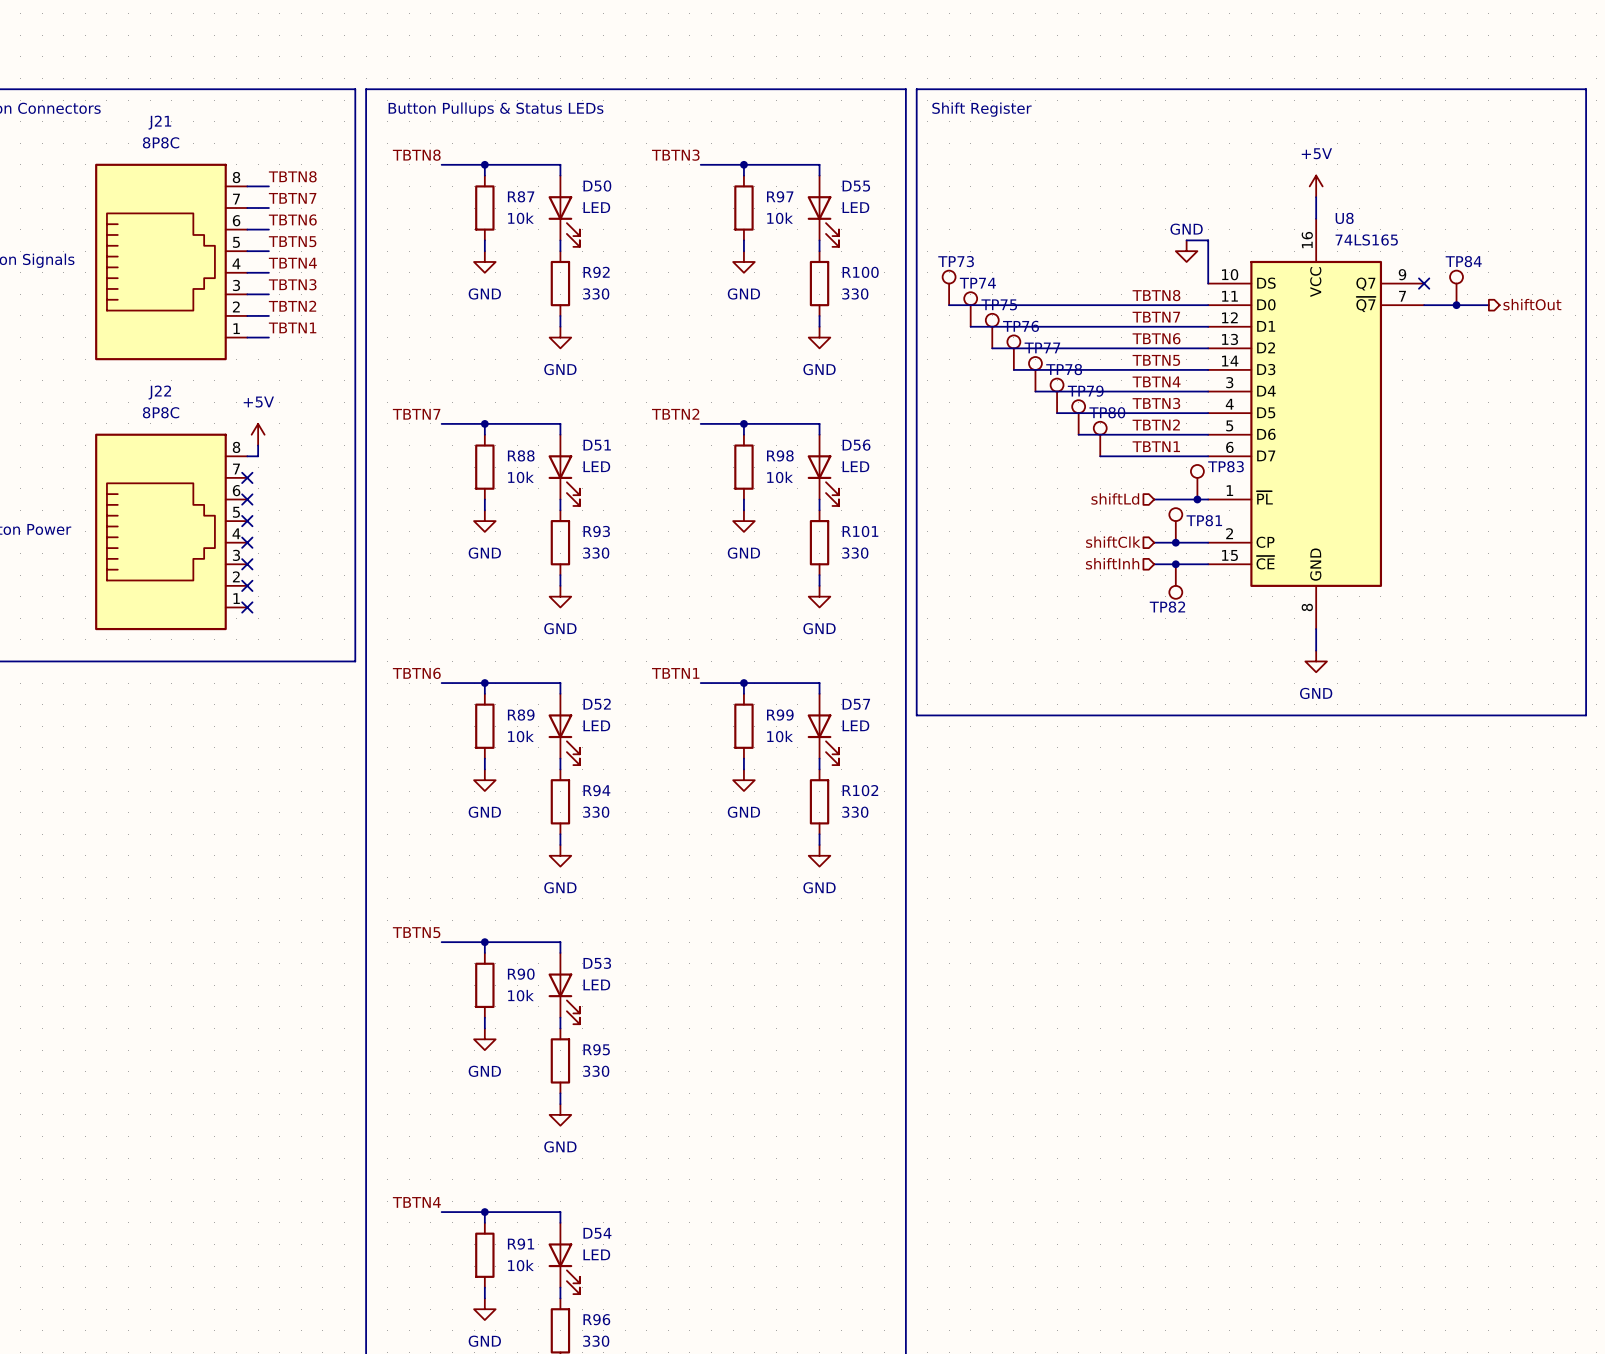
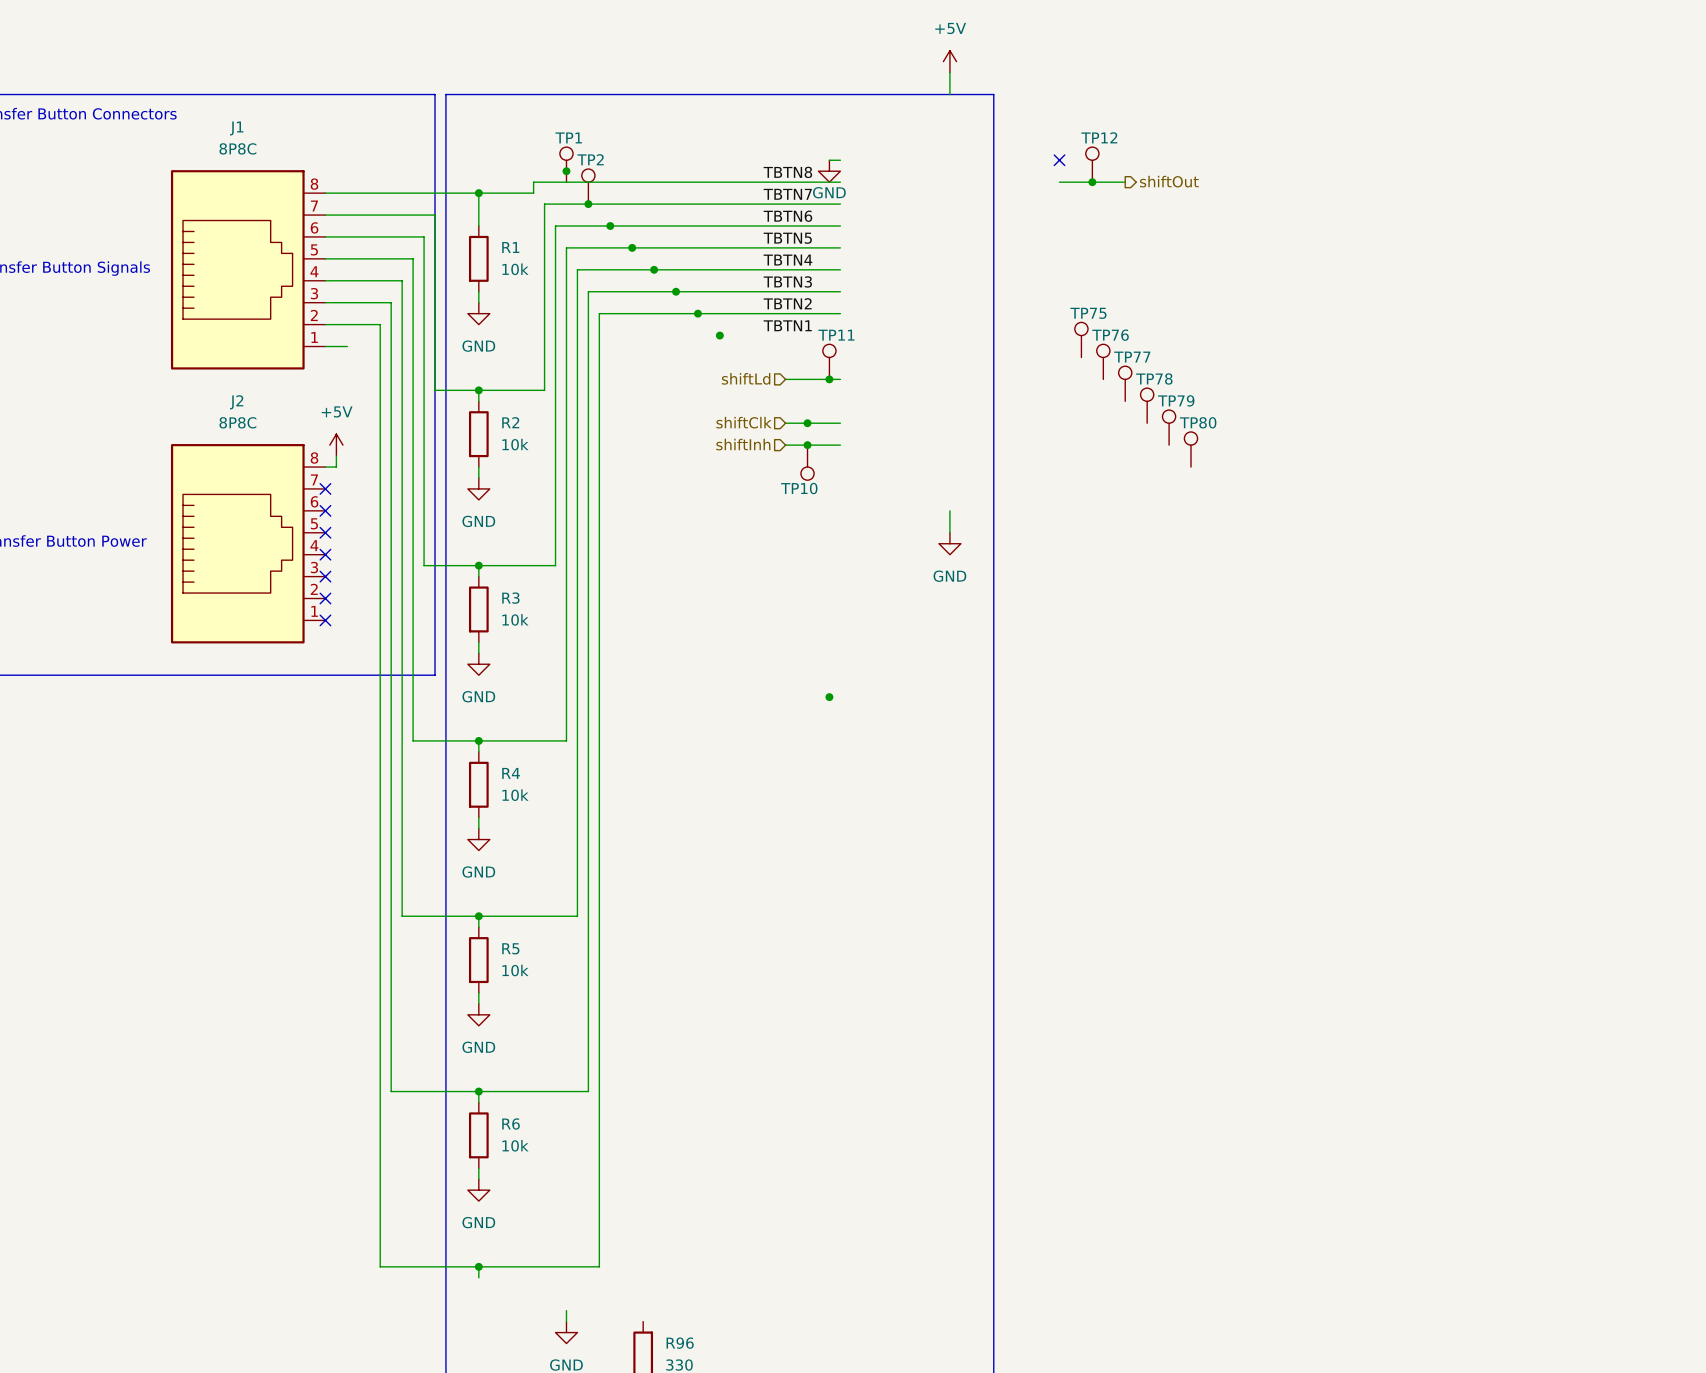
power symbol: none -> +5V (949, 61)
wire: none -> (949, 72) (949, 94)
line: (916, 89) (1586, 89) (1586, 715) (916, 715) (916, 89) -> none
text: Button Pullups & Status LEDs (496, 109) -> none
text: Shift Register (981, 109) -> none
J21 name: J21 (159, 122) -> J1 (236, 128)
wire: none -> (829, 160) (840, 160)
no-connect mark: none -> (1059, 160)
label: TBTN8 (416, 155) -> none
label position: TBTN3 (675, 155) -> TBTN3 (787, 281)
TP1: none -> (566, 164)
TP12: none -> (1092, 164)
wire: (441, 164) (560, 164) (560, 175) -> none
wire: (700, 164) (819, 164) (819, 175) -> none
wire: (743, 164) (743, 175) -> none
junction: (743, 164) -> none
power symbol: none -> GND (829, 171)
label: none -> TBTN8 (787, 172)
wire: none -> (840, 182) (533, 182) (533, 193) (347, 193)
wire: none -> (1059, 182) (1125, 182)
junction: none -> (1092, 182)
hierarchical label: none -> shiftOut (1169, 181)
label: TBTN8 (292, 176) -> none
TP2: none -> (588, 186)
wire: none -> (478, 193) (478, 226)
junction: none -> (478, 193)
power symbol: +5V (1316, 186) -> none
label: none -> TBTN7 (787, 194)
junction: none -> (588, 204)
wire: none -> (840, 204) (544, 204) (544, 390) (435, 390) (435, 215) (347, 215)
wire: (1316, 197) (1316, 218) -> none
label: TBTN7 (292, 198) -> none
R87: 10k (484, 208) -> none
R97: 10k (743, 208) -> none
label: none -> TBTN6 (787, 216)
D50: LED (564, 211) -> none
D55: LED (823, 211) -> none
junction: none -> (610, 226)
wire: none -> (840, 226) (555, 226) (555, 565) (424, 565) (424, 236) (347, 236)
label: TBTN6 (292, 219) -> none
label: none -> TBTN5 (787, 238)
wire: none -> (566, 247) (840, 247)
junction: none -> (632, 247)
wire: (560, 240) (560, 251) -> none
wire: (743, 240) (743, 251) -> none
wire: (819, 240) (819, 251) -> none
wire: (1186, 240) (1208, 240) (1208, 283) -> none
label: TBTN5 (292, 241) -> none
wire: none -> (347, 258) (413, 258) (413, 740) (566, 740) (566, 708)
R1: none -> 10k (478, 258)
wire: none -> (566, 258) (566, 434)
power symbol: GND (1186, 251) -> none
label: none -> TBTN4 (787, 260)
power symbol: GND (484, 261) -> none
junction: none -> (654, 269)
power symbol: GND (743, 261) -> none
wire: none -> (840, 269) (577, 269) (577, 916) (402, 916) (402, 280) (347, 280)
label: TBTN4 (292, 263) -> none
R92: 330 (560, 283) -> none
junction: none -> (676, 291)
wire: none -> (840, 291) (588, 291) (588, 1091) (391, 1091) (391, 302) (347, 302)
R100: 330 (819, 283) -> none
no-connect mark: (1424, 283) -> none
label: TBTN3 (292, 284) -> none
TP73: (949, 287) -> none
TP84: (1456, 287) -> none
label: TBTN8 (1156, 295) -> none
hierarchical label: shiftOut (1532, 304) -> none
power symbol: none -> GND (478, 313)
junction: none -> (697, 313)
wire: none -> (840, 313) (599, 313) (599, 1266) (380, 1266) (380, 324) (347, 324)
wire: (949, 305) (1208, 305) -> none
wire: (1424, 305) (1488, 305) -> none
junction: (1456, 305) -> none
label: TBTN2 (292, 306) -> none
TP74: (970, 309) -> none
wire: (560, 315) (560, 326) -> (478, 291) (478, 302)
wire: (819, 315) (819, 326) -> none
label: none -> TBTN1 (787, 325)
label: TBTN7 (1156, 317) -> none
junction: none -> (719, 335)
wire: (970, 326) (1208, 326) -> none
label: TBTN1 (292, 327) -> none
power symbol: GND (560, 337) -> none
power symbol: GND (819, 337) -> none
label: TBTN6 (1156, 338) -> none
wire: (992, 348) (1208, 348) -> none
TP11: none -> (829, 361)
label: TBTN5 (1156, 360) -> none
hierarchical label: none -> shiftLd (746, 378)
wire: none -> (785, 379) (840, 379)
junction: none -> (829, 379)
wire: (1013, 369) (1208, 369) -> none
wire: none -> (478, 390) (478, 401)
junction: none -> (478, 390)
label: TBTN4 (1156, 381) -> none
wire: (1035, 391) (1208, 391) -> none
J22 name: J22 (159, 392) -> J2 (236, 402)
label: TBTN3 (1156, 403) -> none
hierarchical label: none -> shiftClk (744, 422)
wire: none -> (785, 423) (840, 423)
junction: none -> (807, 423)
wire: (1057, 413) (1208, 413) -> none
label: TBTN7 (416, 414) -> none
label position: TBTN2 (675, 414) -> TBTN2 (787, 303)
R2: none -> 10k (478, 434)
wire: (441, 423) (560, 423) (560, 434) -> none
junction: (484, 423) -> none
wire: (700, 423) (819, 423) (819, 434) -> none
wire: (743, 423) (743, 434) -> none
junction: (743, 423) -> none
U8: 74LS165 (1316, 423) -> none
label: TBTN2 (1156, 424) -> none
wire: none -> (566, 445) (566, 510)
hierarchical label: none -> shiftInh (743, 444)
wire: none -> (785, 445) (840, 445)
junction: none -> (807, 445)
wire: (1078, 434) (1208, 434) -> none
label: TBTN1 (1156, 446) -> none
TP10: none -> (807, 462)
wire: none -> (478, 467) (478, 477)
wire: (1100, 456) (1208, 456) -> none
R88: 10k (484, 467) -> none
R98: 10k (743, 467) -> none
D51: LED (564, 470) -> none
D56: LED (823, 470) -> none
power symbol: none -> GND (478, 488)
TP83: (1197, 482) -> none
hierarchical label: shiftLd (1115, 498) -> none
wire: (560, 499) (560, 510) -> (478, 565) (478, 576)
wire: (743, 499) (743, 510) -> none
wire: (819, 499) (819, 510) -> none
wire: none -> (949, 510) (949, 532)
wire: (1154, 499) (1208, 499) -> none
junction: (1197, 499) -> none
wire: none -> (566, 521) (566, 697)
power symbol: GND (484, 521) -> none
power symbol: GND (743, 521) -> none
TP81: (1175, 525) -> none
power symbol: none -> GND (949, 543)
R93: 330 (560, 542) -> none
R101: 330 (819, 542) -> none
hierarchical label: shiftClk (1113, 542) -> none
wire: (1154, 542) (1208, 542) -> none
junction: (1175, 542) -> none
junction: none -> (478, 565)
hierarchical label: shiftInh (1112, 563) -> none
wire: (1154, 564) (1208, 564) -> none
junction: (1175, 564) -> none
wire: (560, 575) (560, 585) -> (478, 642) (478, 653)
wire: (819, 575) (819, 585) -> none
TP82: (1175, 581) -> none
R3: none -> 10k (478, 609)
power symbol: GND (560, 596) -> none
power symbol: GND (819, 596) -> none
wire: (1316, 629) (1316, 650) -> none
power symbol: none -> GND (478, 664)
power symbol: GND (1316, 661) -> none
label: TBTN6 (416, 673) -> none
label: TBTN1 (675, 673) -> none
wire: (441, 683) (560, 683) (560, 693) -> none
junction: (484, 683) -> none
wire: (700, 683) (819, 683) (819, 693) -> none
wire: (743, 683) (743, 693) -> none
junction: none -> (478, 740)
R89: 10k (484, 726) -> none
R99: 10k (743, 726) -> none
D52: LED (564, 729) -> none
D57: LED (823, 729) -> none
wire: (484, 758) (484, 769) -> none
wire: (560, 758) (560, 769) -> (478, 740) (478, 751)
wire: (743, 758) (743, 769) -> none
wire: (819, 758) (819, 769) -> none
R4: none -> 10k (478, 784)
power symbol: GND (484, 780) -> none
power symbol: GND (743, 780) -> none
R94: 330 (560, 801) -> none
R102: 330 (819, 801) -> none
power symbol: none -> GND (478, 839)
wire: (560, 834) (560, 844) -> (478, 817) (478, 828)
wire: (819, 834) (819, 844) -> none
power symbol: GND (560, 855) -> none
power symbol: GND (819, 855) -> none
junction: none -> (478, 916)
label: TBTN5 (416, 932) -> none
R5: none -> 10k (478, 960)
wire: (441, 942) (560, 942) (560, 952) -> none
wire: (484, 942) (484, 952) -> (478, 992) (478, 1003)
junction: (484, 942) -> none
R90: 10k (484, 985) -> none
D53: LED (564, 988) -> none
power symbol: none -> GND (478, 1014)
wire: (484, 1017) (484, 1028) -> (478, 916) (478, 927)
wire: (560, 1017) (560, 1028) -> (478, 1091) (478, 1102)
power symbol: GND (484, 1039) -> none
R95: 330 (560, 1060) -> none
junction: none -> (478, 1091)
wire: (560, 1093) (560, 1104) -> (478, 1168) (478, 1179)
R6: none -> 10k (478, 1135)
power symbol: GND (560, 1114) -> none
power symbol: none -> GND (478, 1190)
label: TBTN4 (416, 1202) -> none
wire: (441, 1212) (560, 1212) (560, 1222) -> none
wire: (484, 1212) (484, 1222) -> none
junction: (484, 1212) -> none
junction: none -> (478, 1266)
R91: 10k (484, 1255) -> none
D54: LED (564, 1258) -> none
wire: (560, 1287) (560, 1298) -> (478, 1266) (478, 1277)

